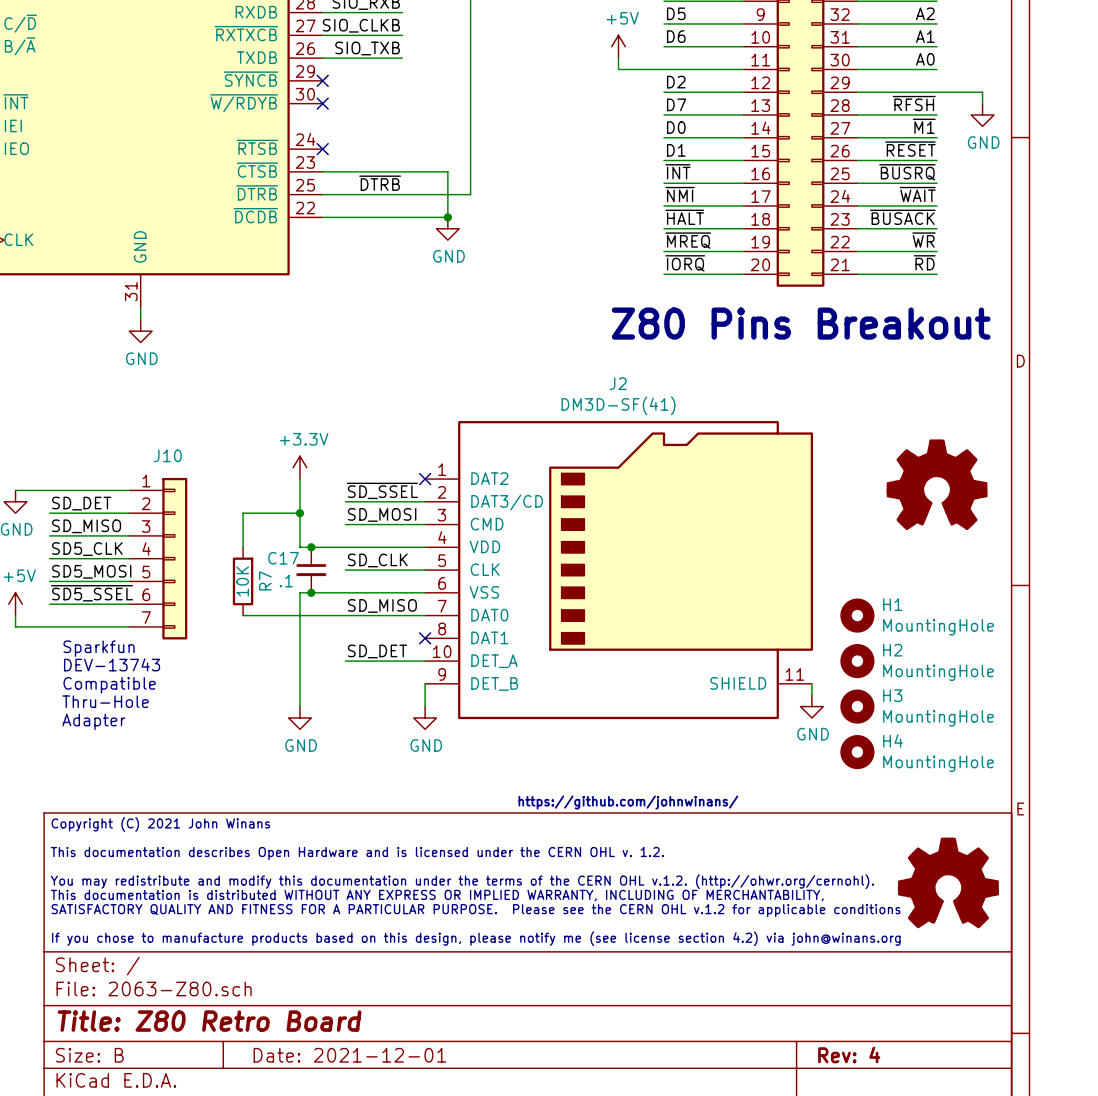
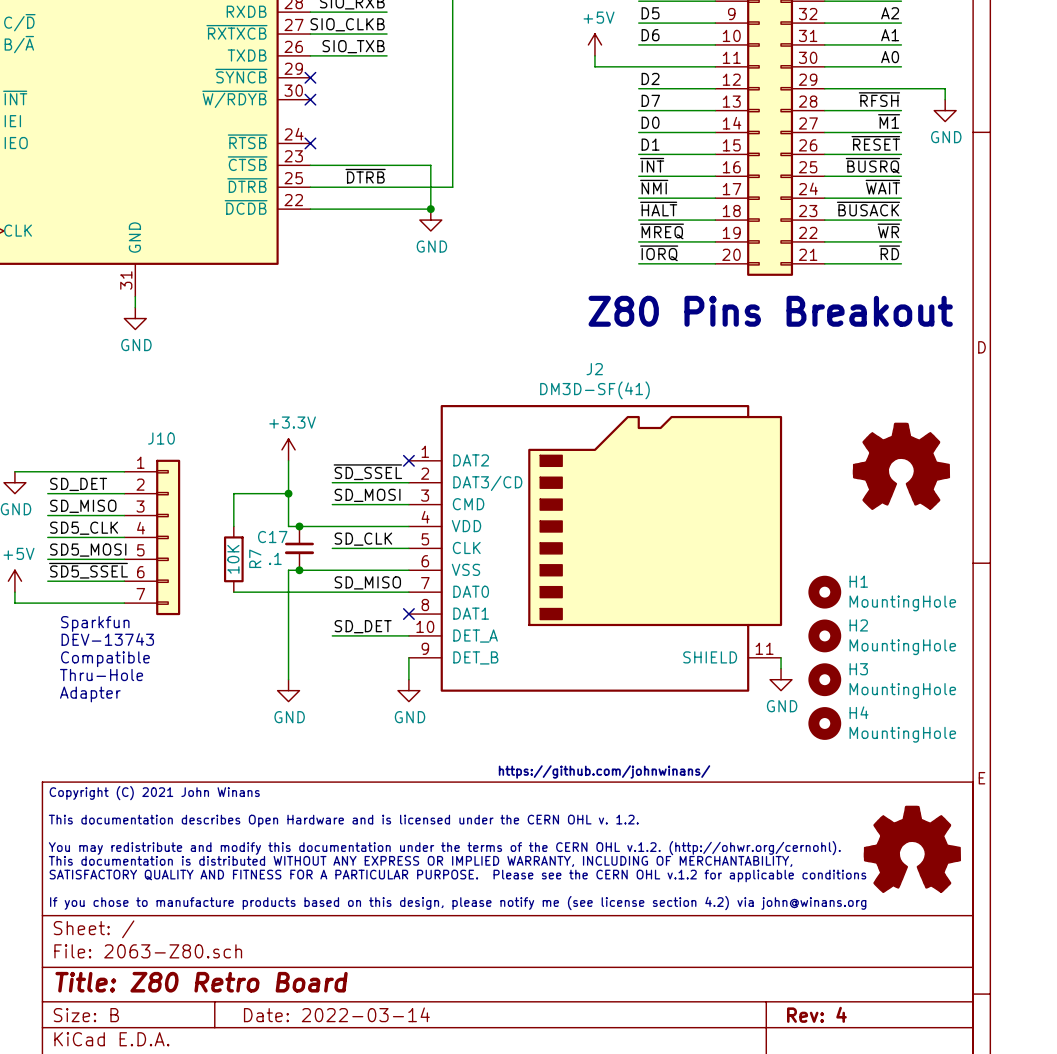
title block: Date: 2021-12-01 (349, 1055) -> Date: 2022-03-14 (336, 1014)

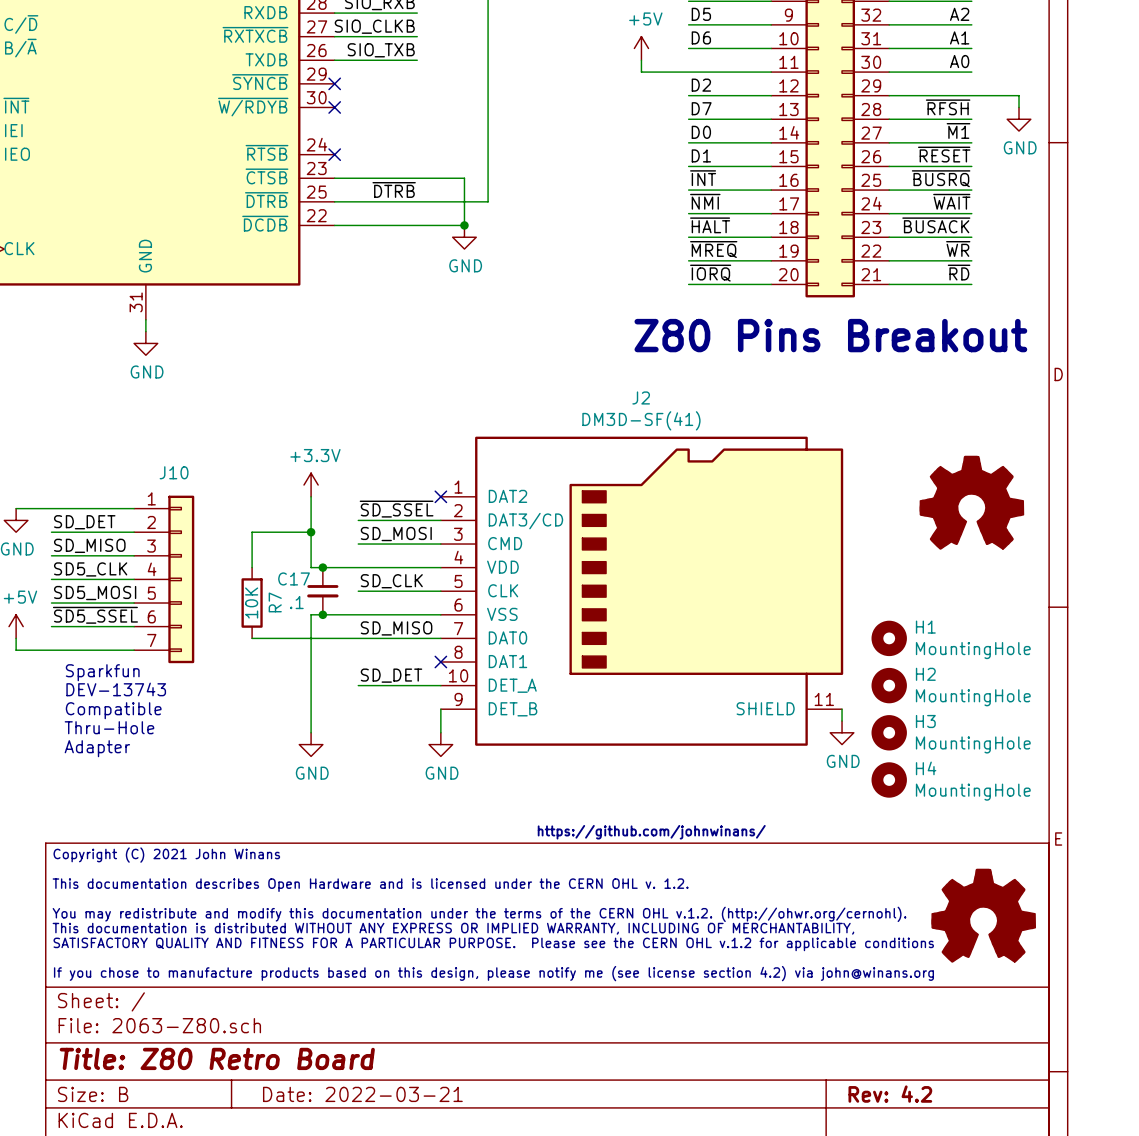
title block: Date: 2022-03-14 (336, 1014) -> Date: 2022-03-21 (362, 1094)
title block: Rev: 4 (816, 1014) -> Rev: 4.2 (890, 1094)

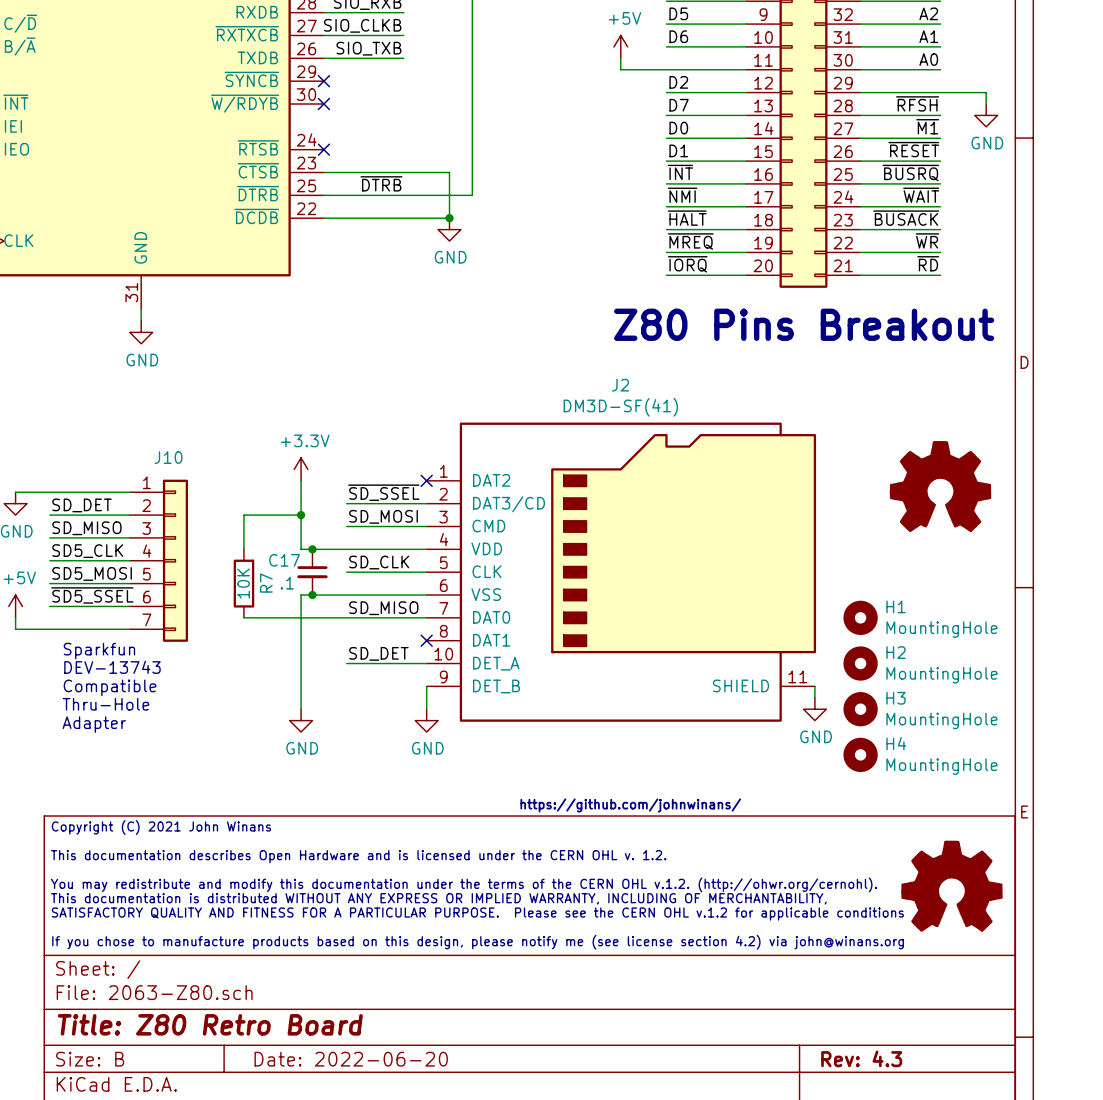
title block: Date: 2022-03-21 (362, 1094) -> Date: 2022-06-20 (351, 1059)
title block: Rev: 4.2 (890, 1094) -> Rev: 4.3 (861, 1058)

